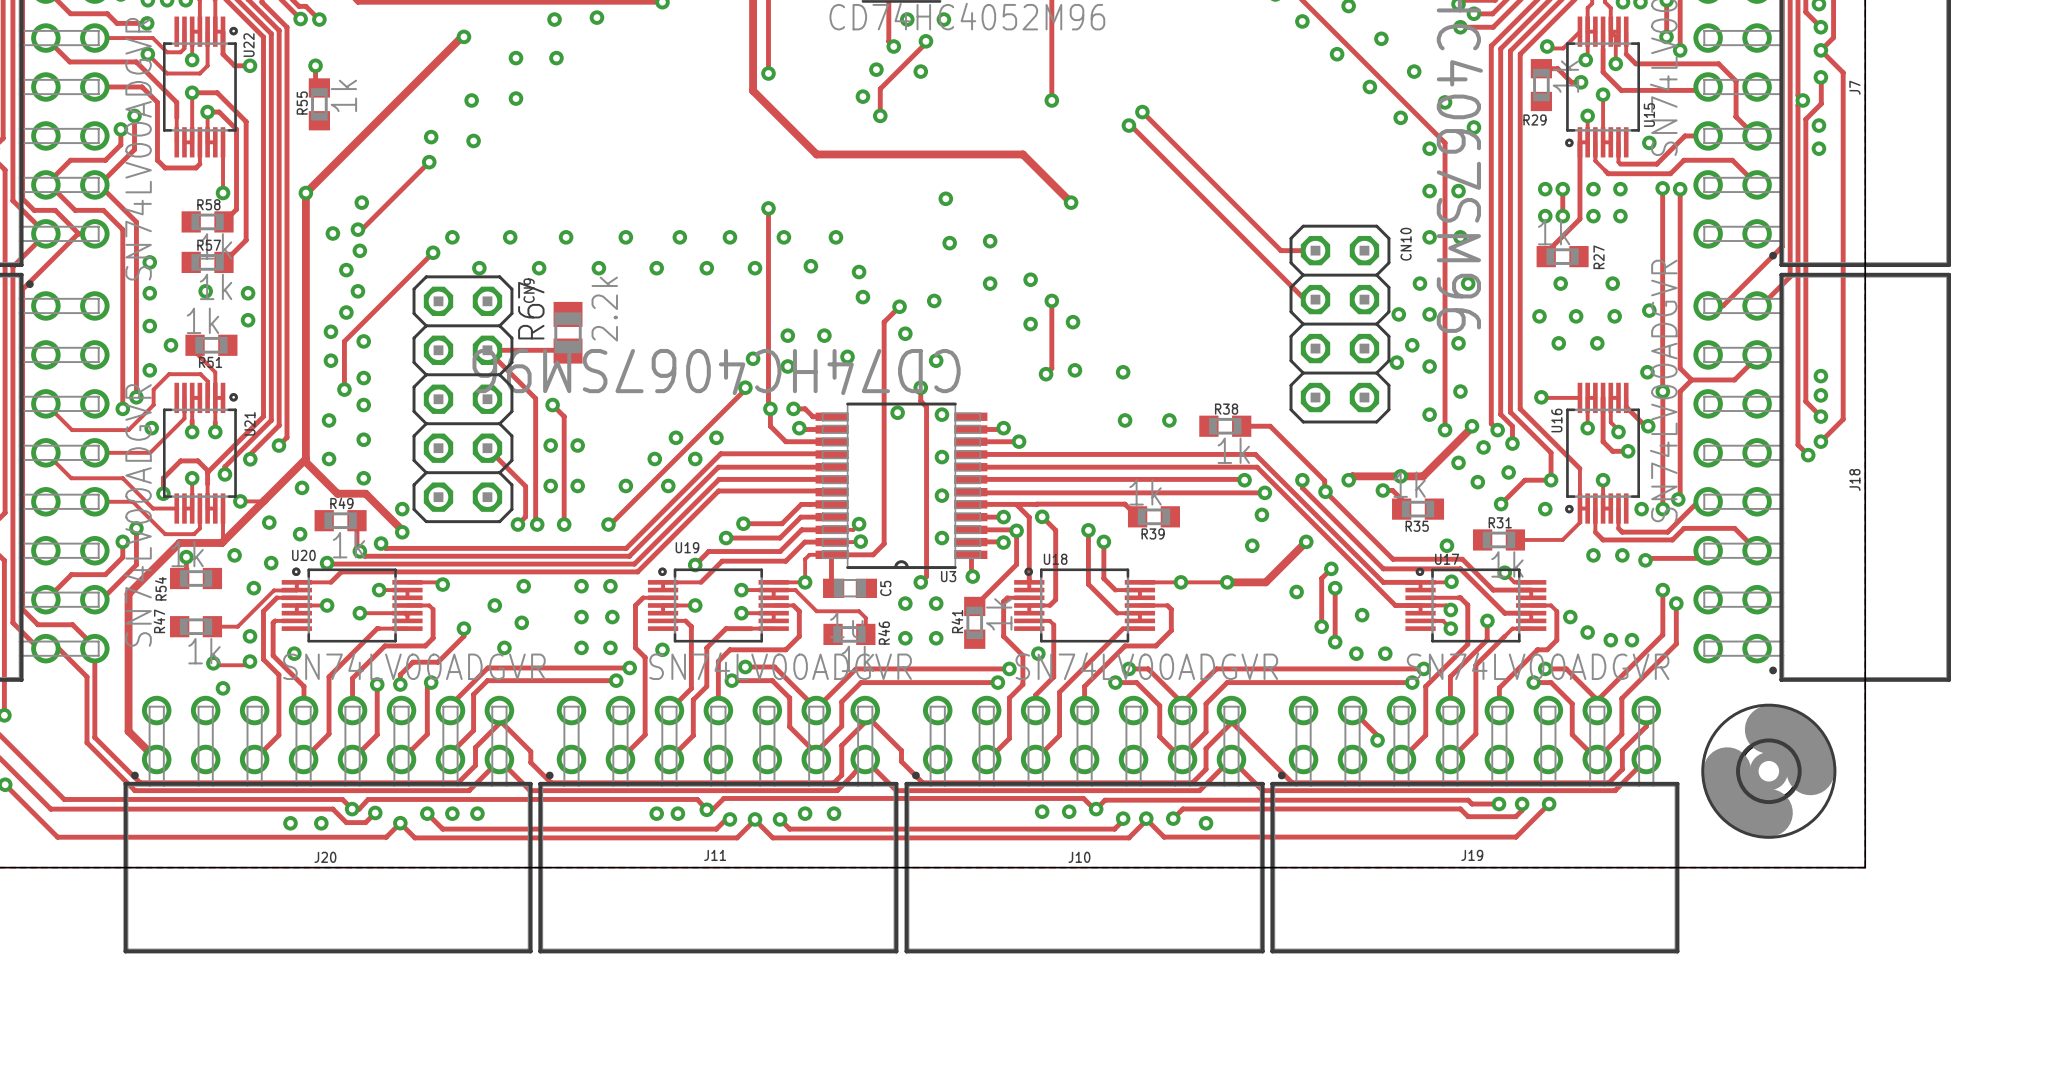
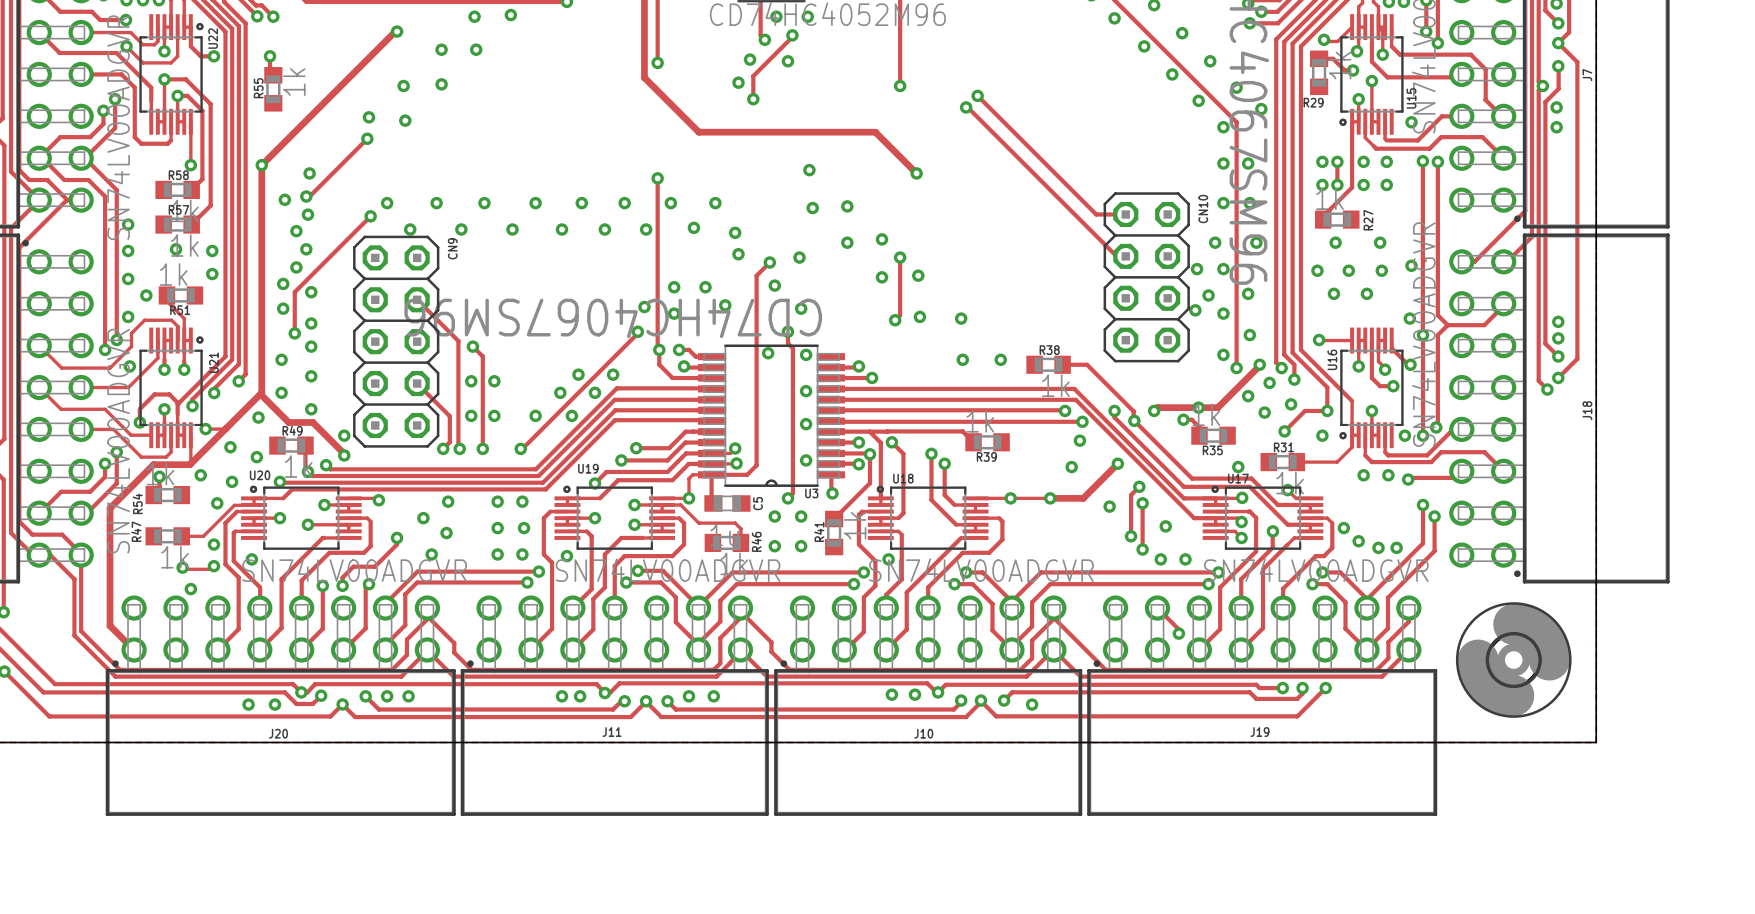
R67: 2.2k (568, 332) -> none
track: (487, 350) (568, 351) -> none

